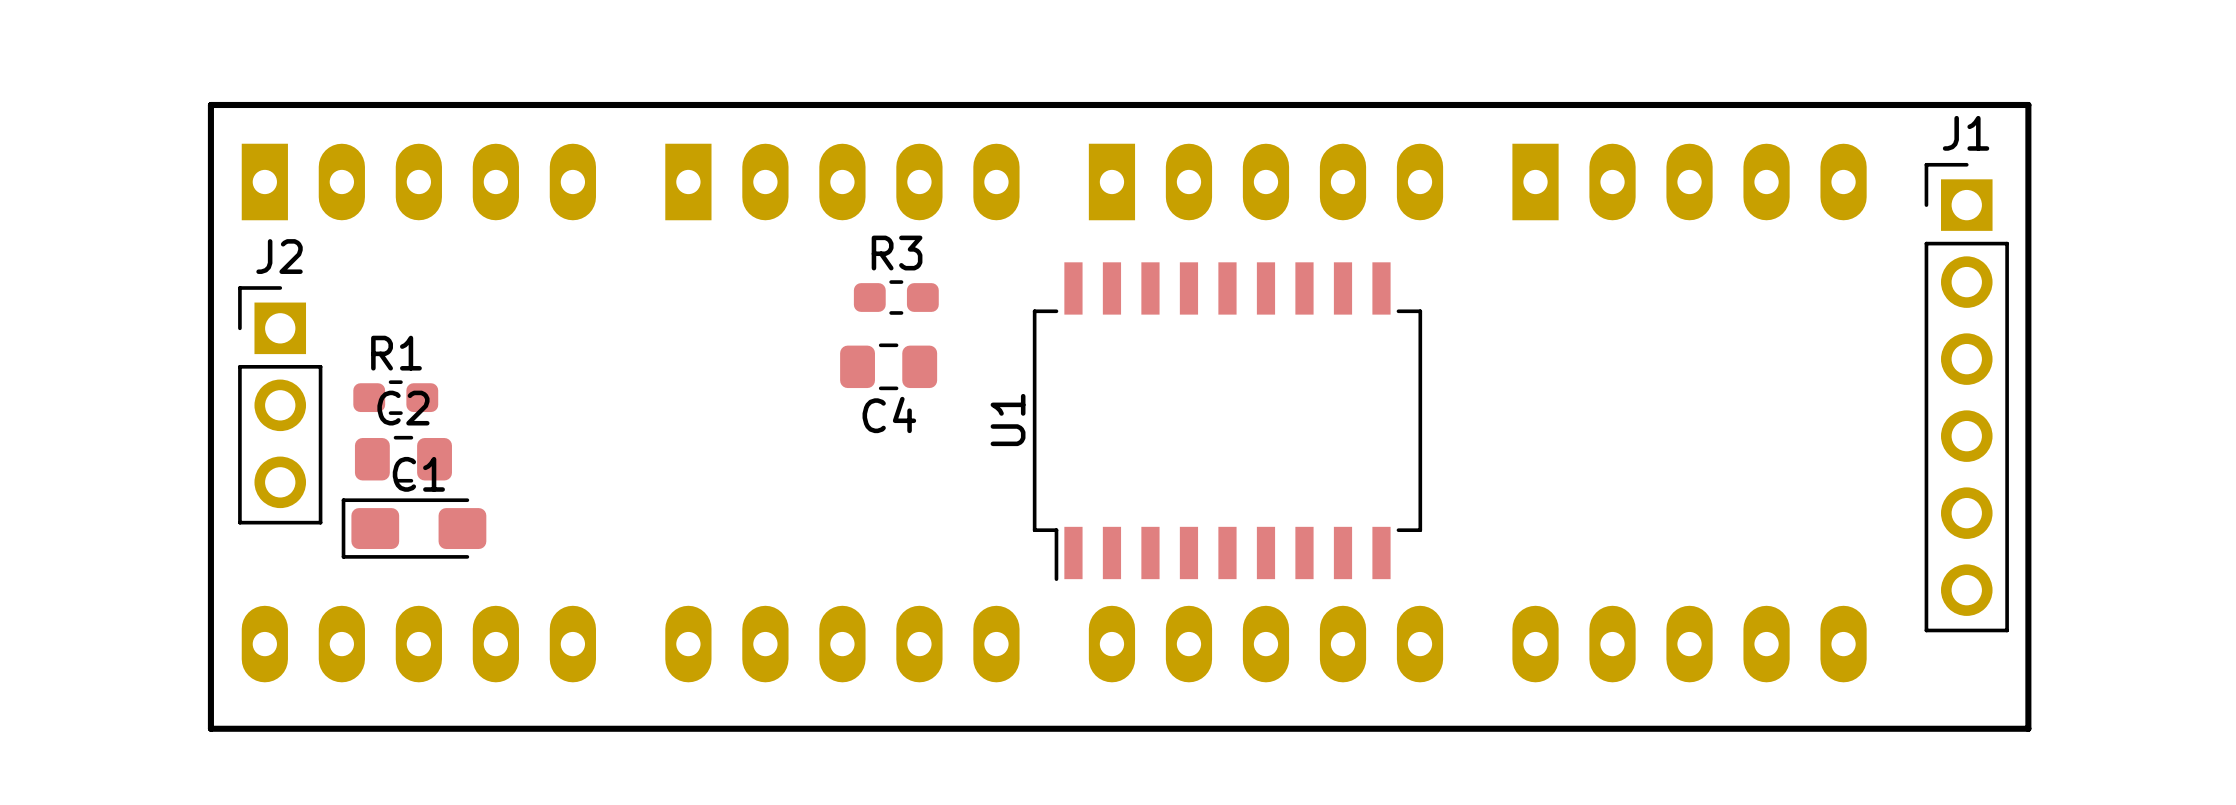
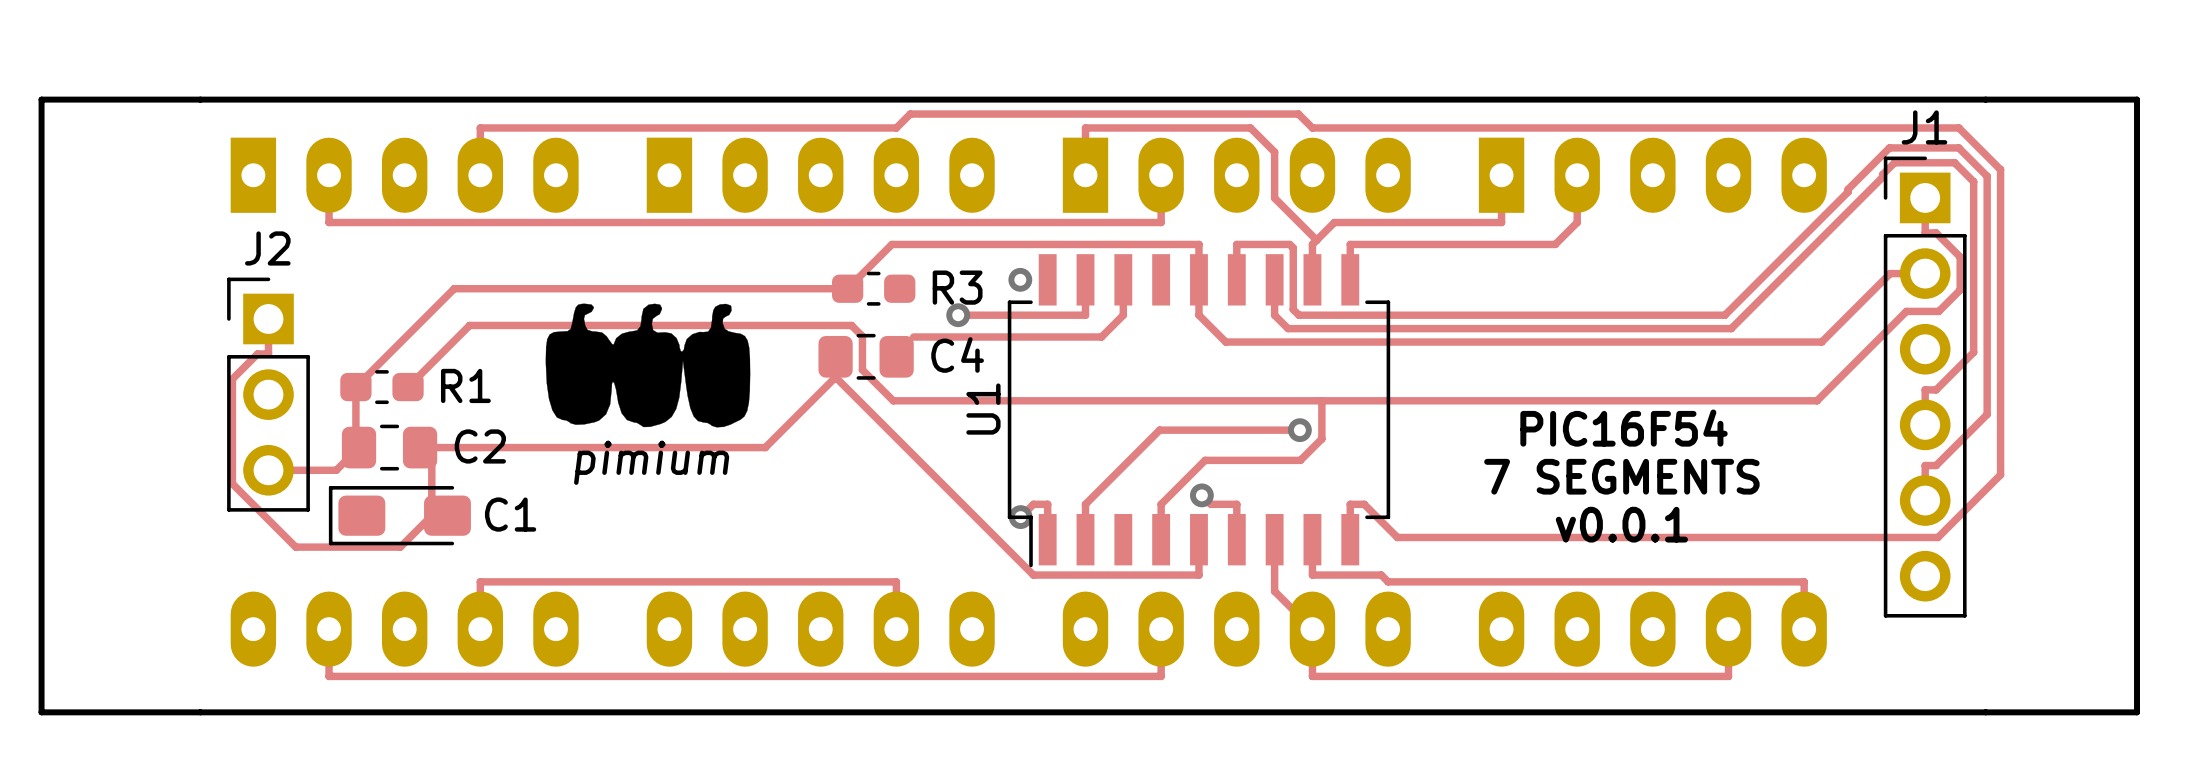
board edge: (210, 104) (210, 728) -> (200, 99) (41, 99) (41, 712) (200, 712)
board edge: (2028, 104) (2028, 728) -> (1985, 99) (2137, 99) (2137, 712) (1985, 712)
track: none -> (329, 175) (329, 222) (1161, 222) (1161, 175)
track: none -> (480, 175) (480, 127) (896, 127) (910, 114) (1298, 114) (1312, 127) (1958, 127) (2000, 169) (2000, 474) (1937, 537) (1397, 537) (1364, 504) (1350, 504) (1350, 539)
track: none -> (1085, 175) (1085, 127) (1250, 127) (1274, 152) (1274, 198) (1316, 240)
track: none -> (1501, 175) (1501, 222) (1334, 222) (1312, 244) (1312, 279)
track: none -> (1577, 175) (1577, 222) (1555, 244) (1350, 244) (1350, 279)
track: none -> (1925, 197) (1925, 232) (1936, 232) (1960, 257) (1960, 290) (1938, 311) (1906, 311) (1817, 400) (893, 400) (862, 369) (862, 336) (851, 325) (469, 325) (408, 387)
R3 name position: R3 (897, 253) -> R3 (957, 287)
track: none -> (1925, 273) (1890, 273) (1821, 342) (1225, 342) (1198, 315) (1198, 244) (891, 244) (847, 288) (454, 288) (355, 387) (355, 444) (359, 447) (336, 470) (268, 470)
via: none -> (1020, 279)
track: none -> (1085, 279) (1085, 315) (958, 315)
track: none -> (1123, 279) (1123, 315) (1101, 337) (913, 337)
track: none -> (1236, 279) (1236, 244) (1289, 244) (1293, 247) (1293, 309) (1298, 315) (1724, 315) (1889, 147) (1958, 147) (1987, 176) (1987, 414) (1936, 465) (1925, 465) (1925, 500)
track: none -> (1274, 279) (1274, 315) (1288, 328) (1731, 328) (1882, 177) (1882, 174) (1894, 162) (1954, 162) (1973, 181) (1973, 352) (1936, 389) (1925, 389) (1925, 424)
drawing: none -> [545, 303, 751, 428]
via: none -> (958, 315)
track: none -> (268, 318) (268, 353) (257, 353) (232, 379) (232, 483) (295, 547) (400, 547) (431, 515)
R1 name position: R1 (396, 353) -> R1 (465, 385)
track: none -> (835, 377) (1033, 575) (1198, 575) (1198, 539)
track: none -> (835, 377) (765, 447) (420, 447) (431, 459) (431, 515)
C2 name position: C2 (403, 408) -> C2 (480, 446)
track: none -> (1321, 400) (1321, 438) (1300, 460) (1205, 460) (1161, 504) (1161, 539)
C4 name position: C4 (889, 414) -> C4 (957, 354)
text: none -> PIC16F54 (1624, 428)
track: none -> (1299, 430) (1159, 430) (1085, 504) (1085, 539)
via: none -> (1299, 430)
C1 name position: C1 (418, 474) -> C1 (510, 514)
text: none -> 7 SEGMENTS (1621, 476)
track: none -> (1201, 495) (1210, 504) (1236, 504) (1236, 539)
via: none -> (1201, 495)
track: none -> (1020, 517) (1033, 504) (1047, 504) (1047, 539)
via: none -> (1020, 517)
text: none -> v0.0.1 (1621, 524)
track: none -> (1274, 539) (1274, 591) (1312, 629) (1312, 676) (1728, 676) (1728, 629)
track: none -> (1312, 539) (1312, 575) (1381, 575) (1388, 581) (1804, 581) (1804, 629)
track: none -> (329, 629) (329, 676) (1161, 676) (1161, 629)
track: none -> (480, 629) (480, 581) (896, 581) (896, 629)

